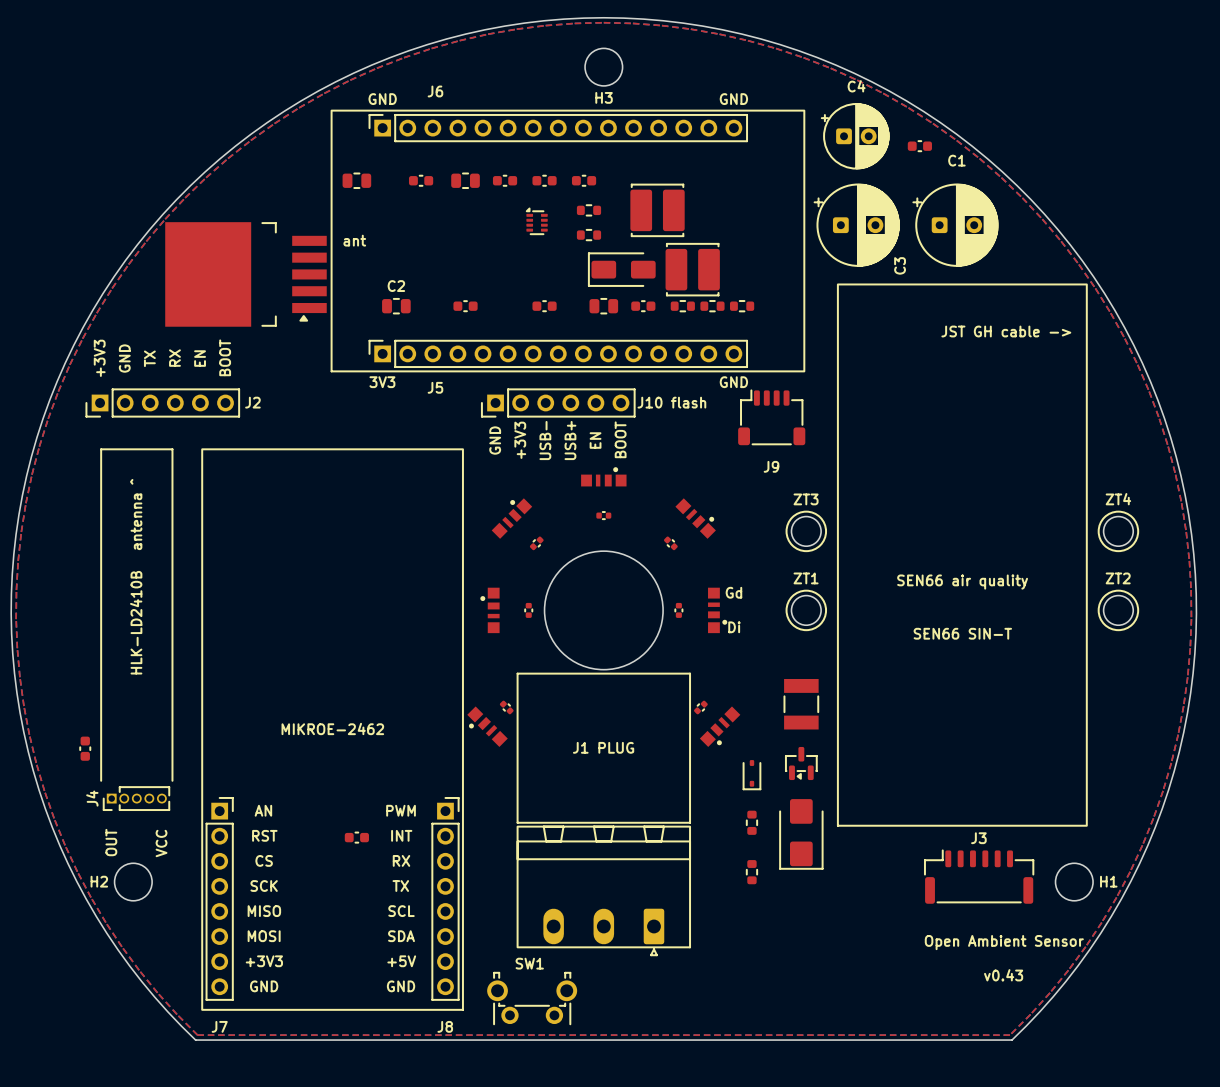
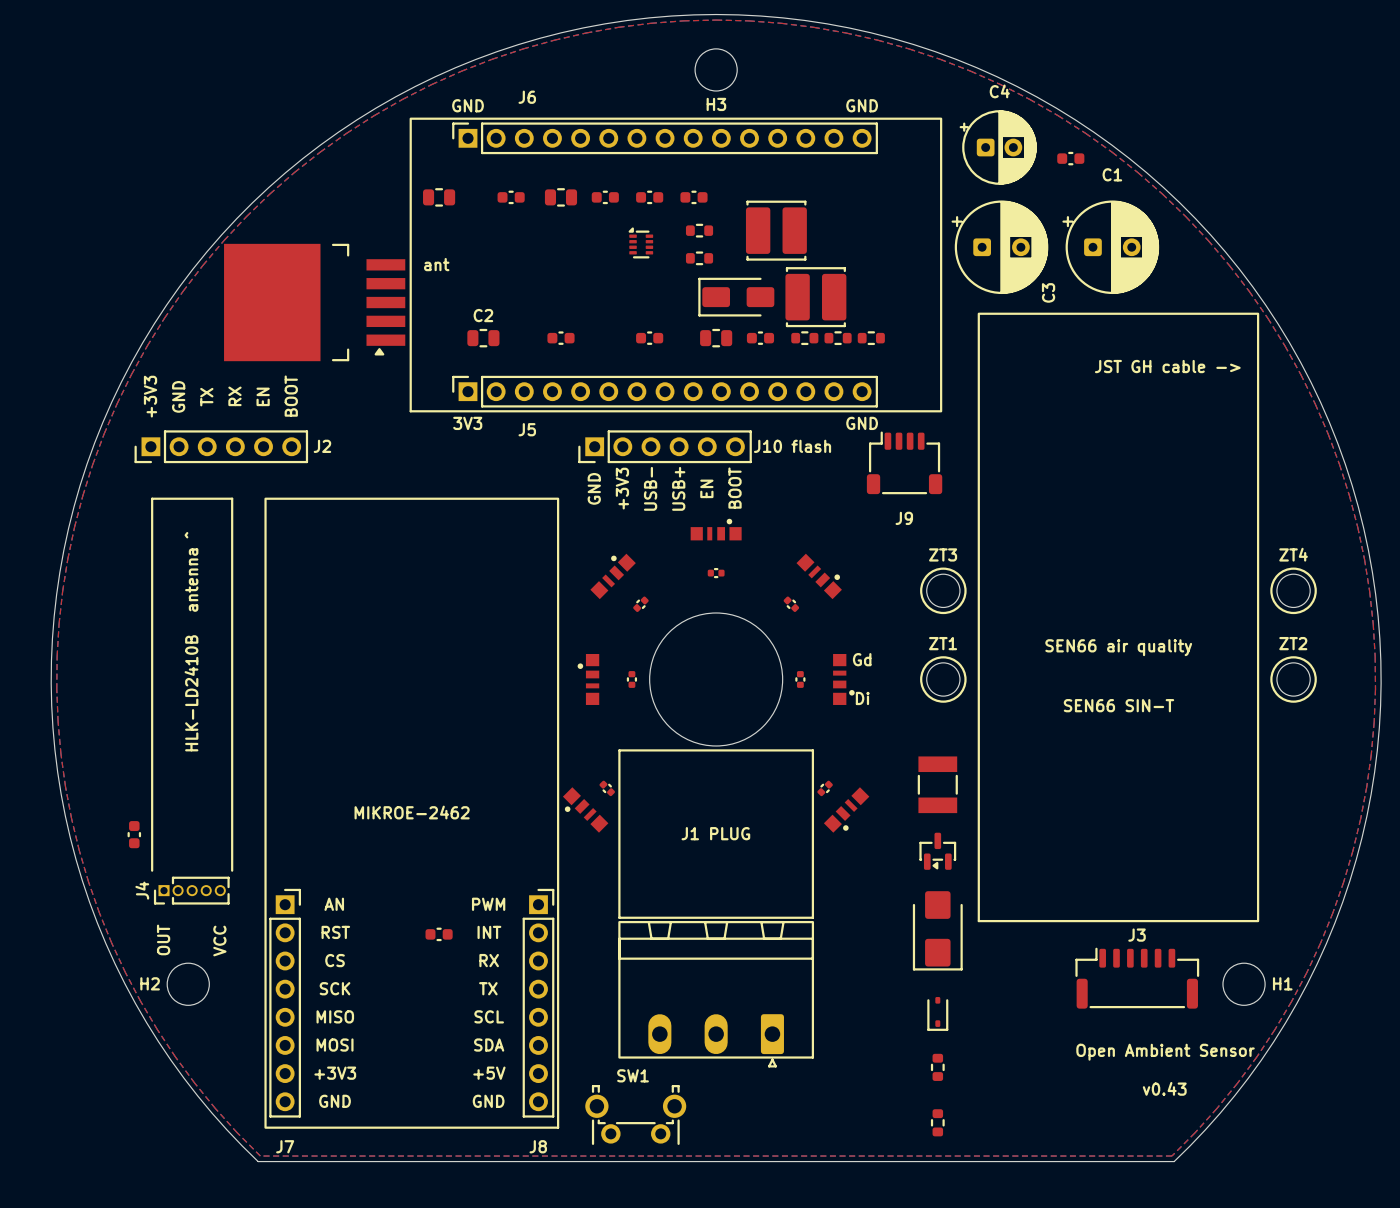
part position: (751, 775) -> (937, 1013)
part: (751, 822) -> none
part: (751, 872) -> none
part: none -> (937, 1067)
part: none -> (937, 1122)

